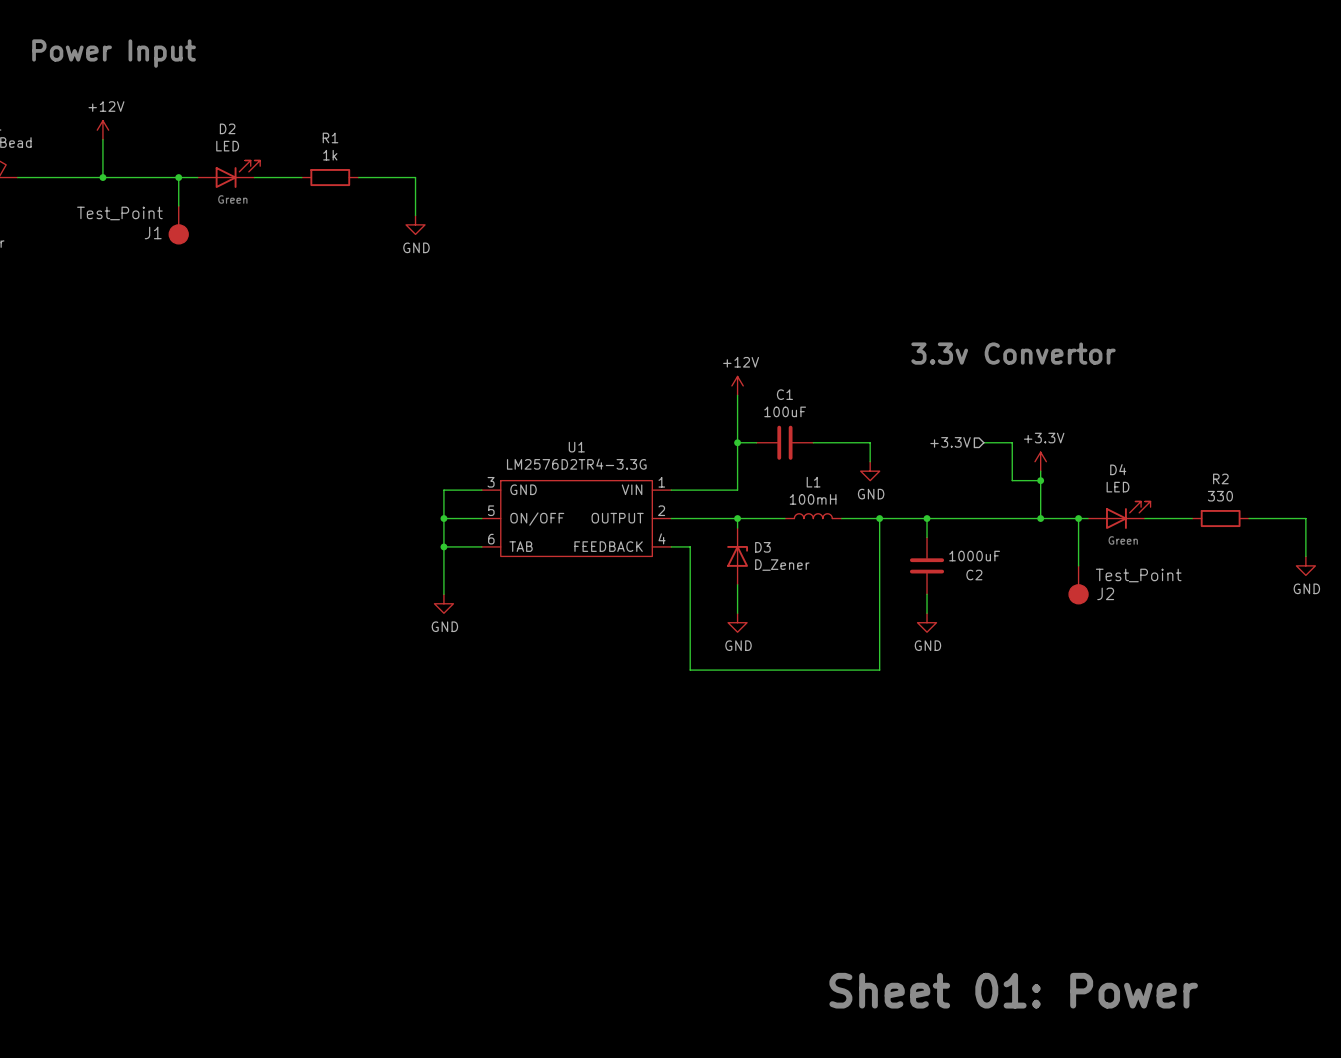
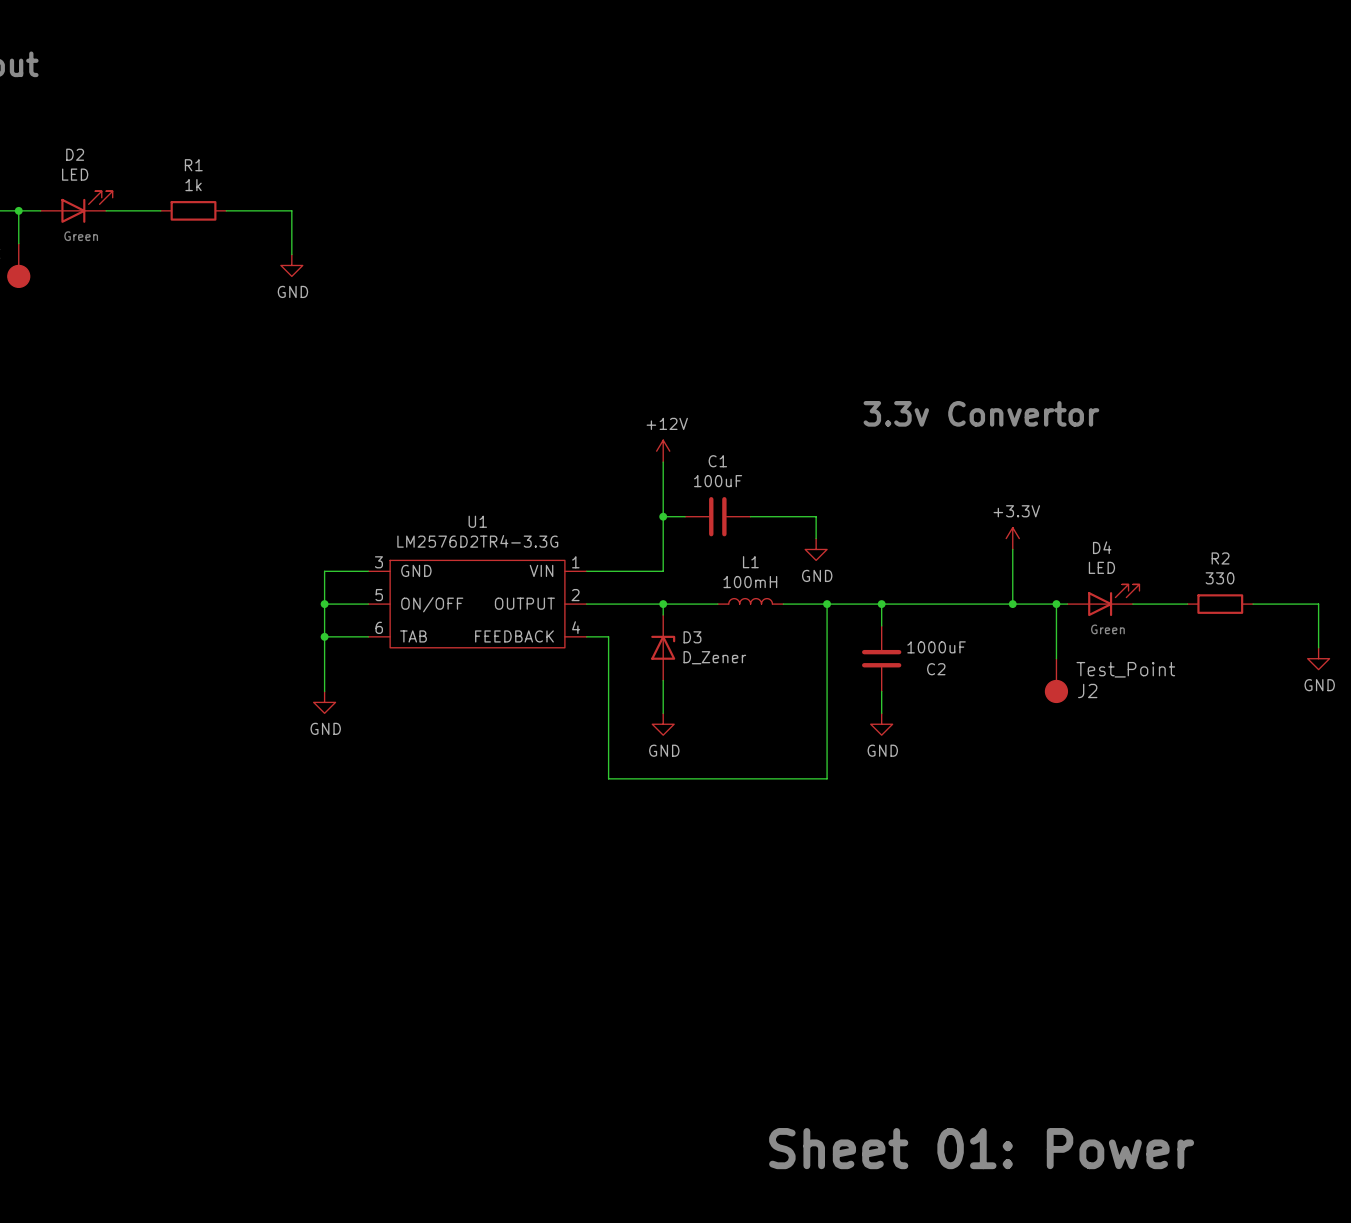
hierarchical label: +3.3V (950, 442) -> none
wire: (983, 442) (1012, 442) (1012, 480) (1040, 480) -> none
junction: (1040, 480) -> none

